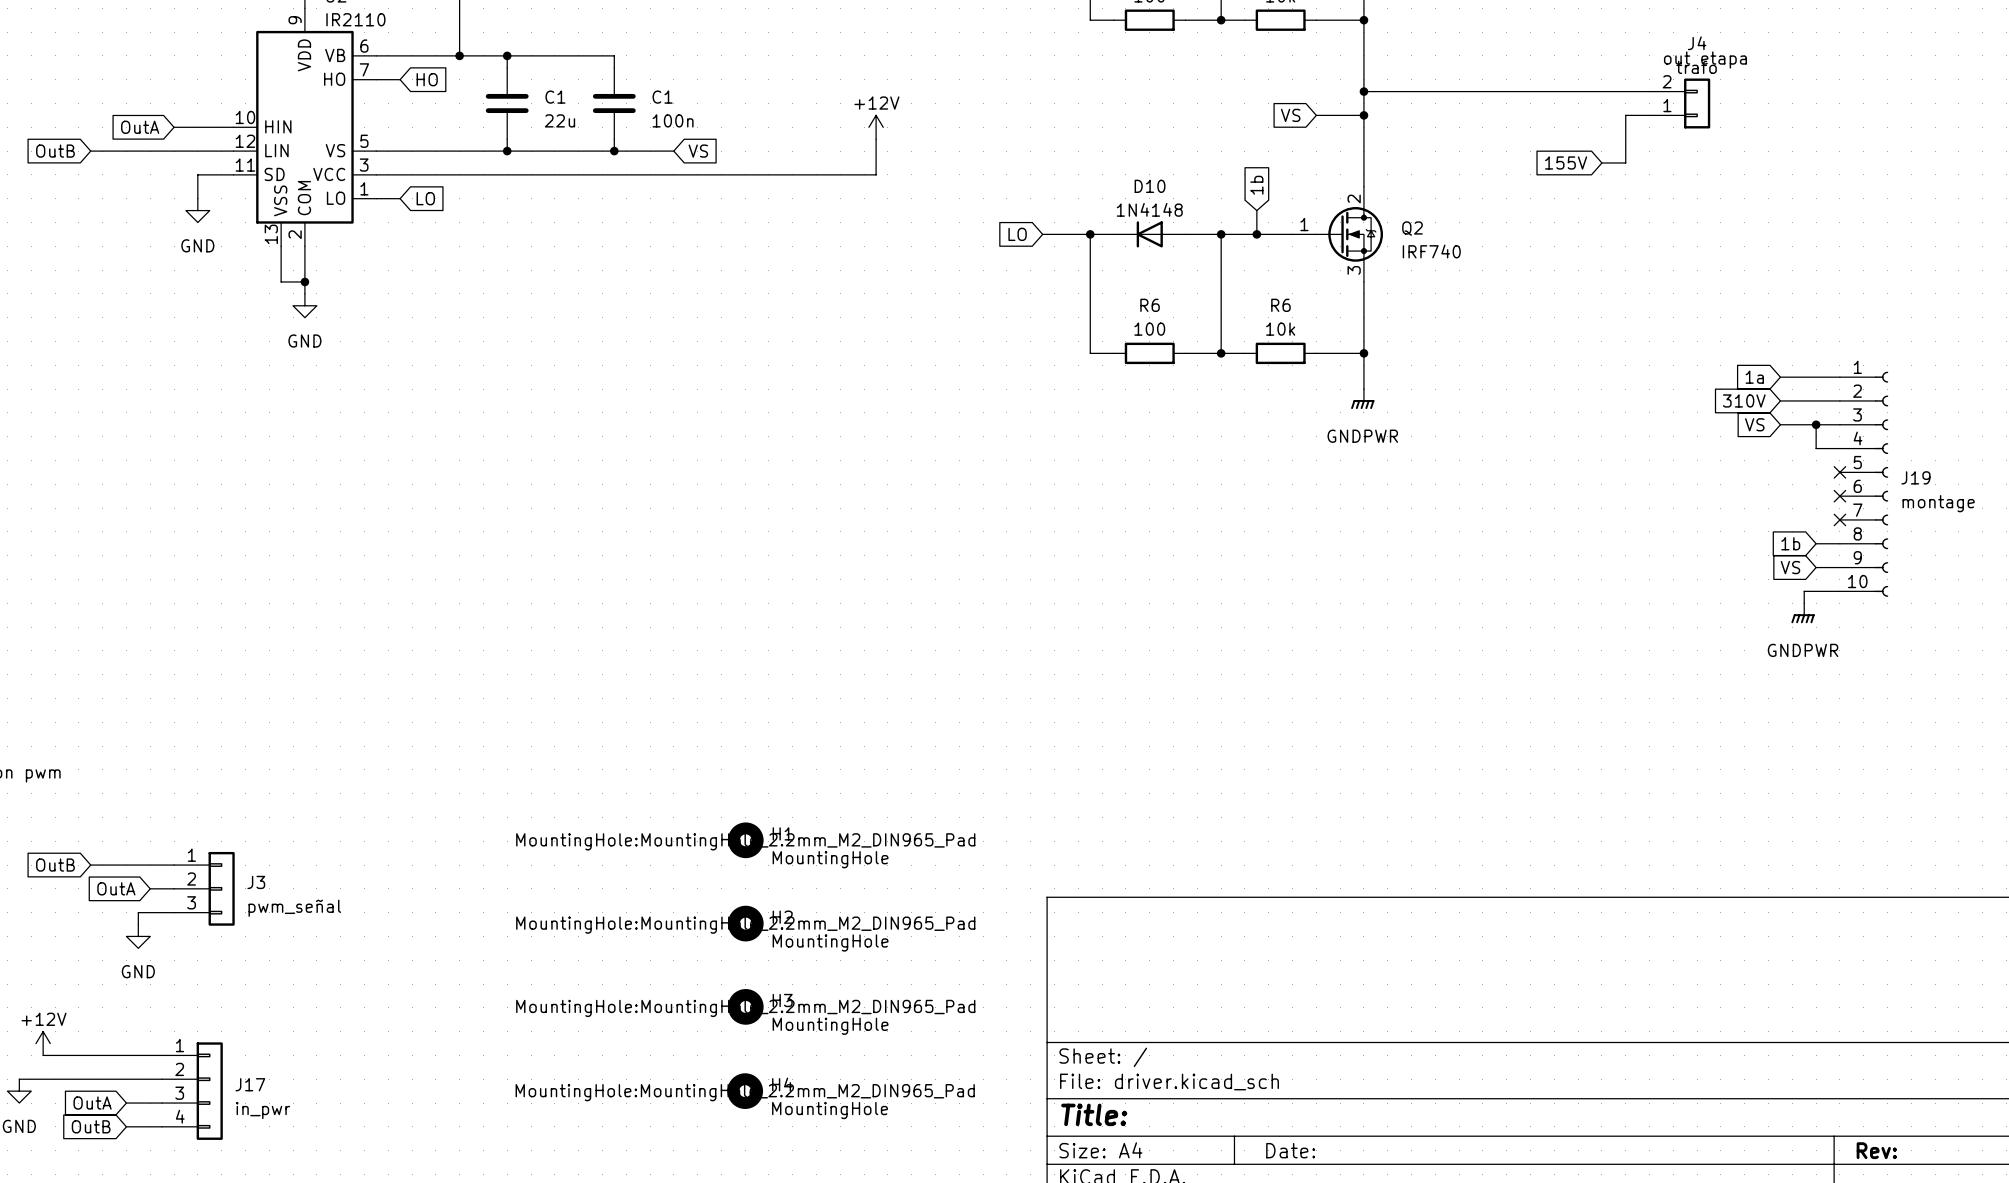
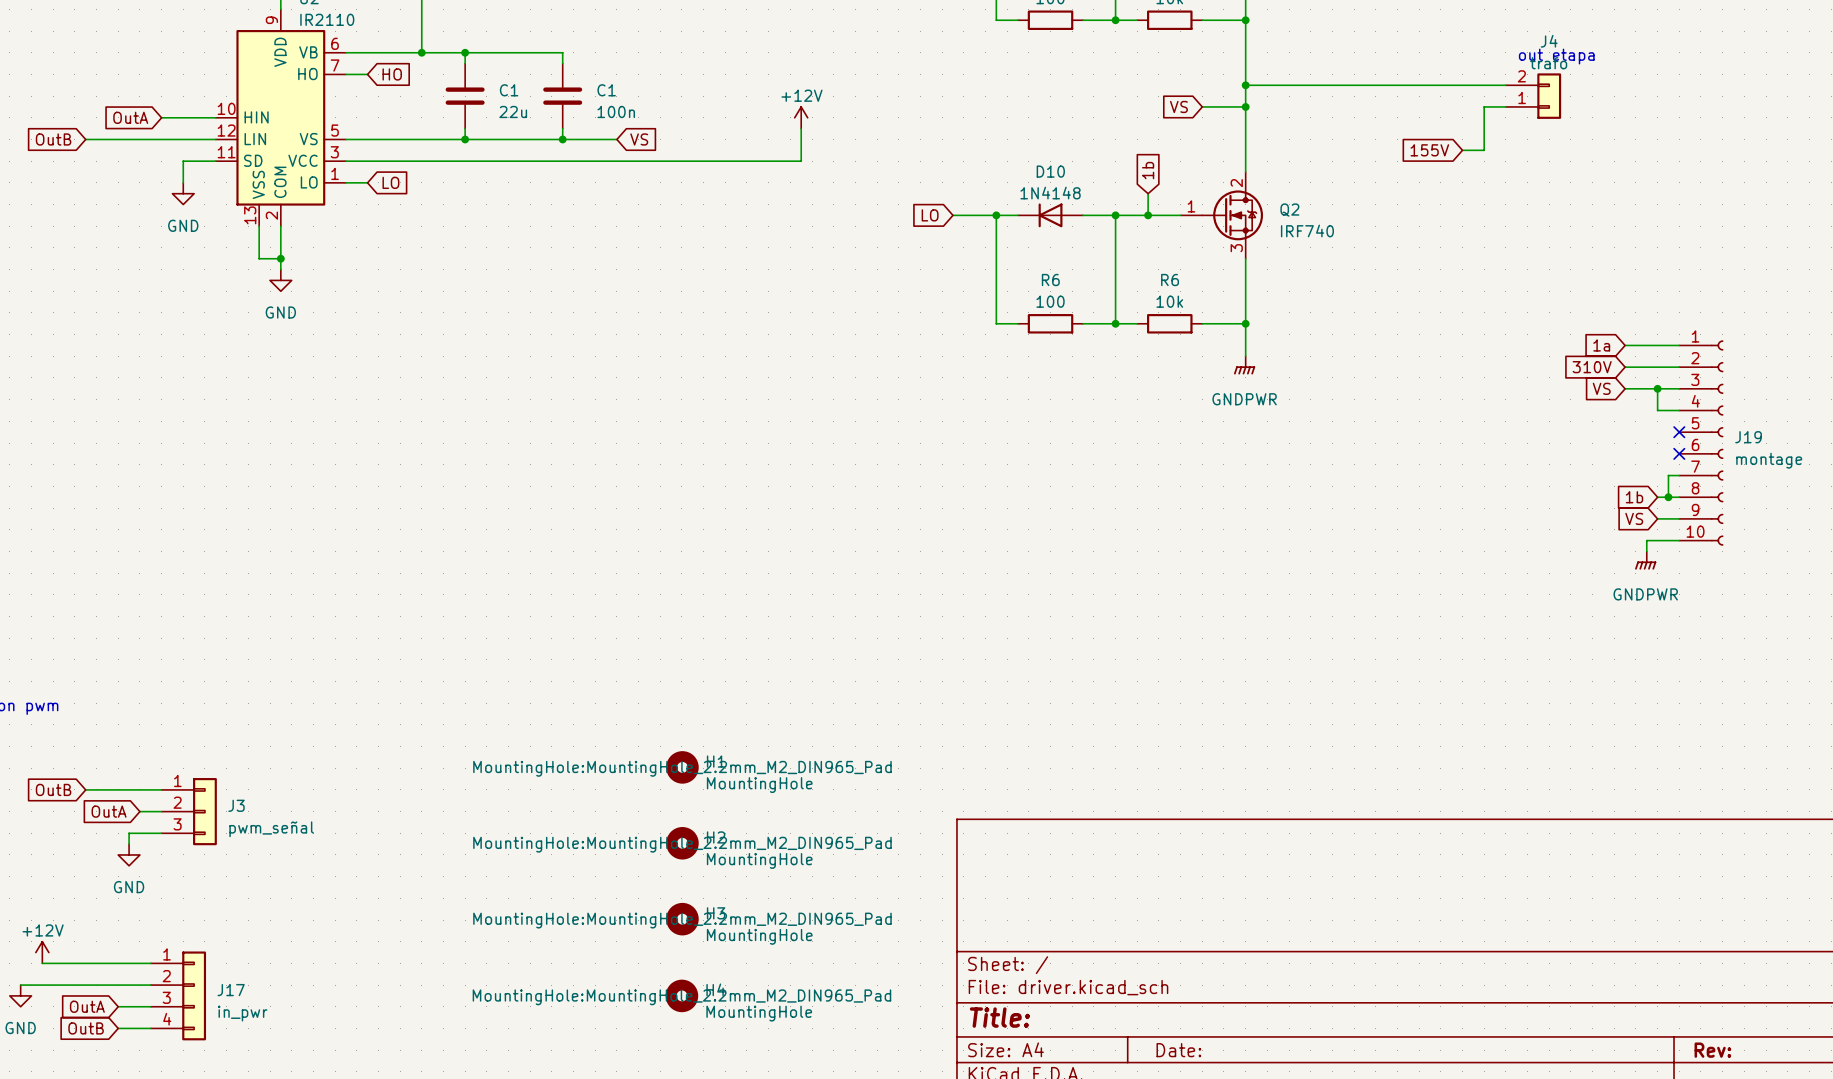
wire: none -> (1679, 475) (1668, 475) (1668, 497)
no-connect mark: (1839, 519) -> none
junction: none -> (1668, 497)

